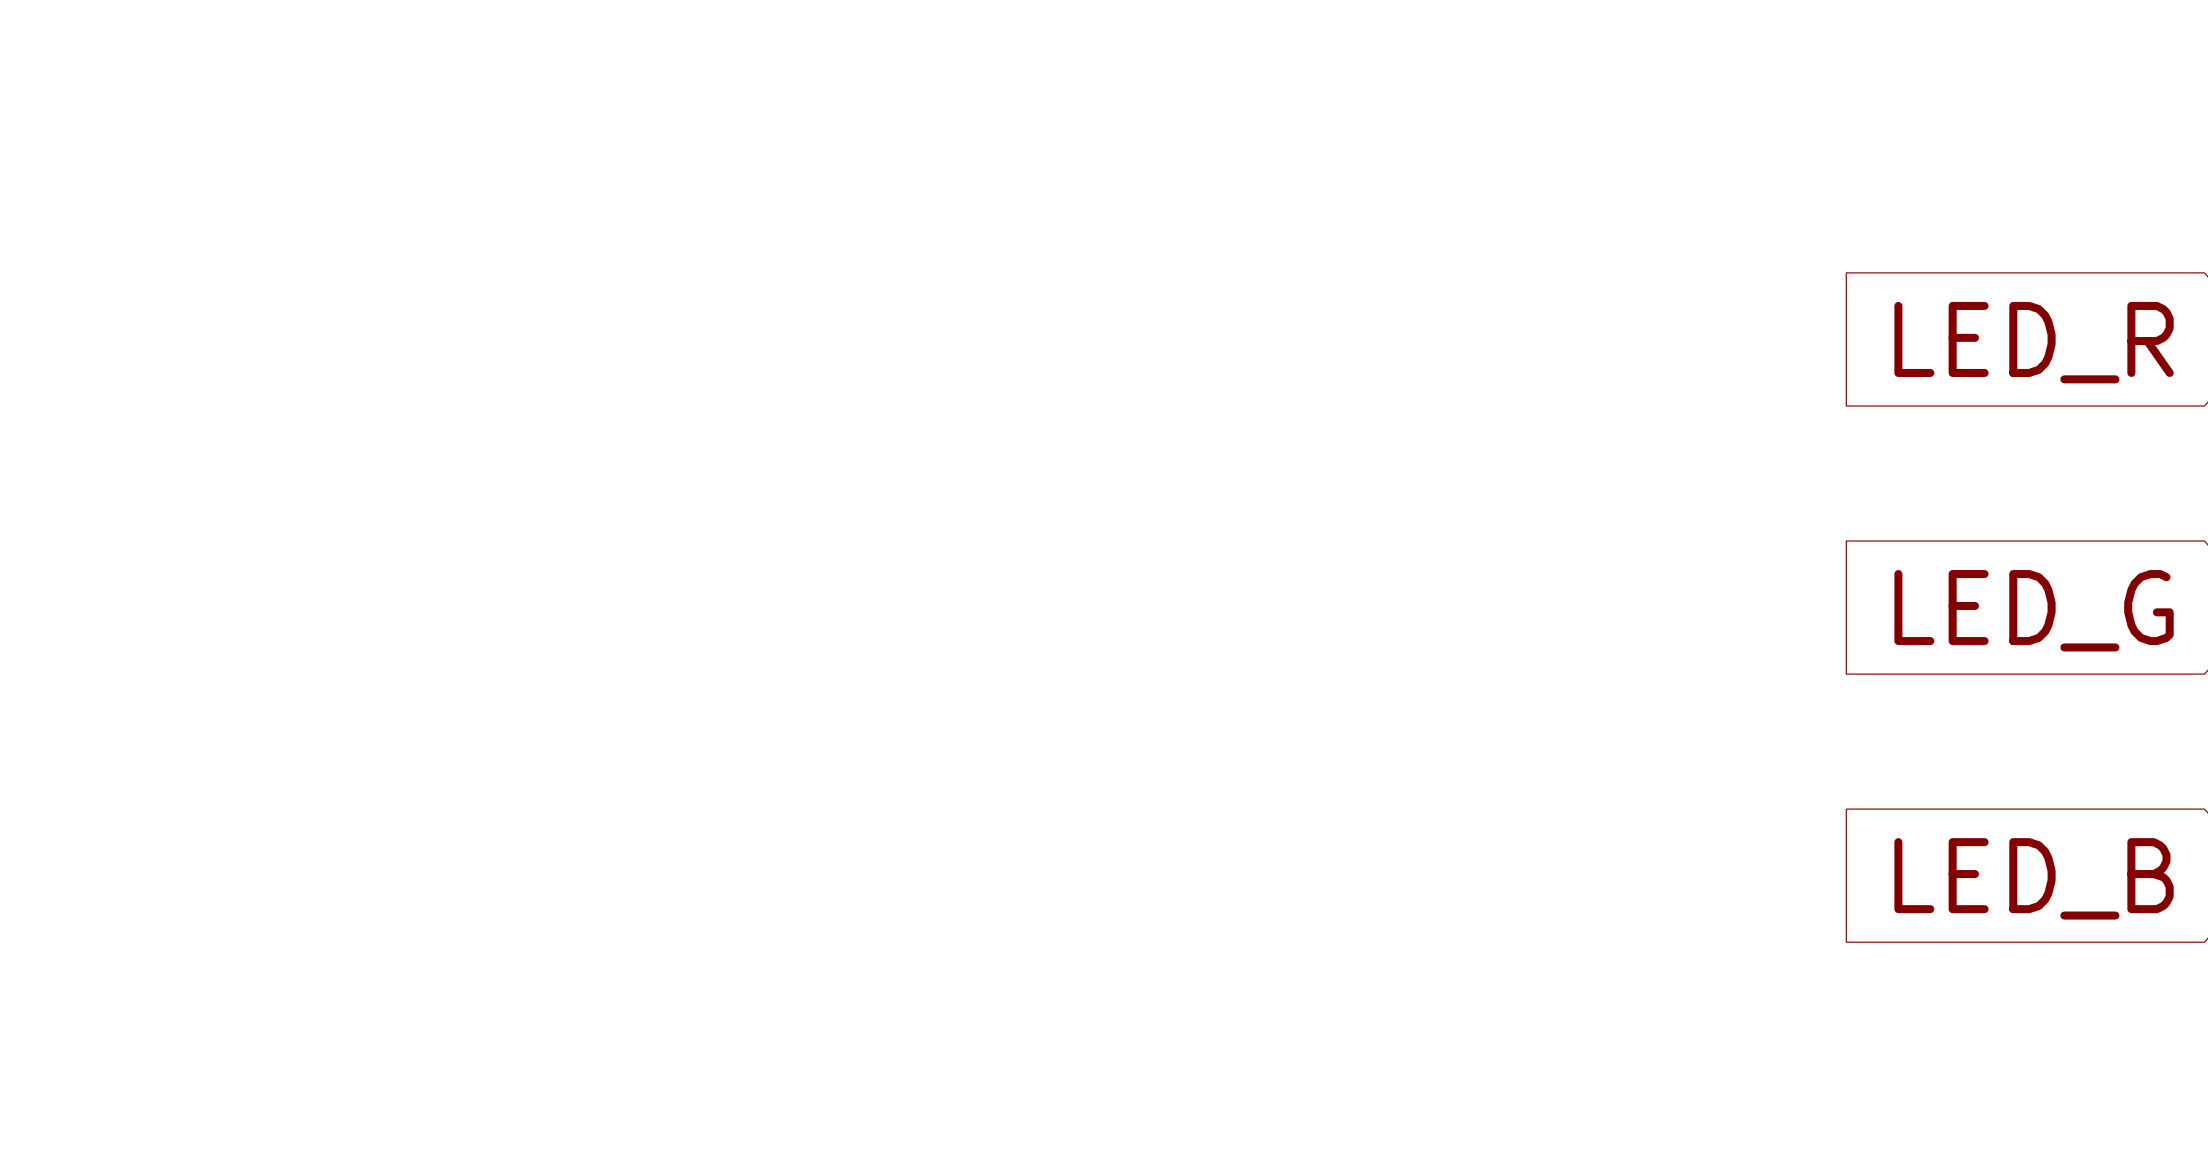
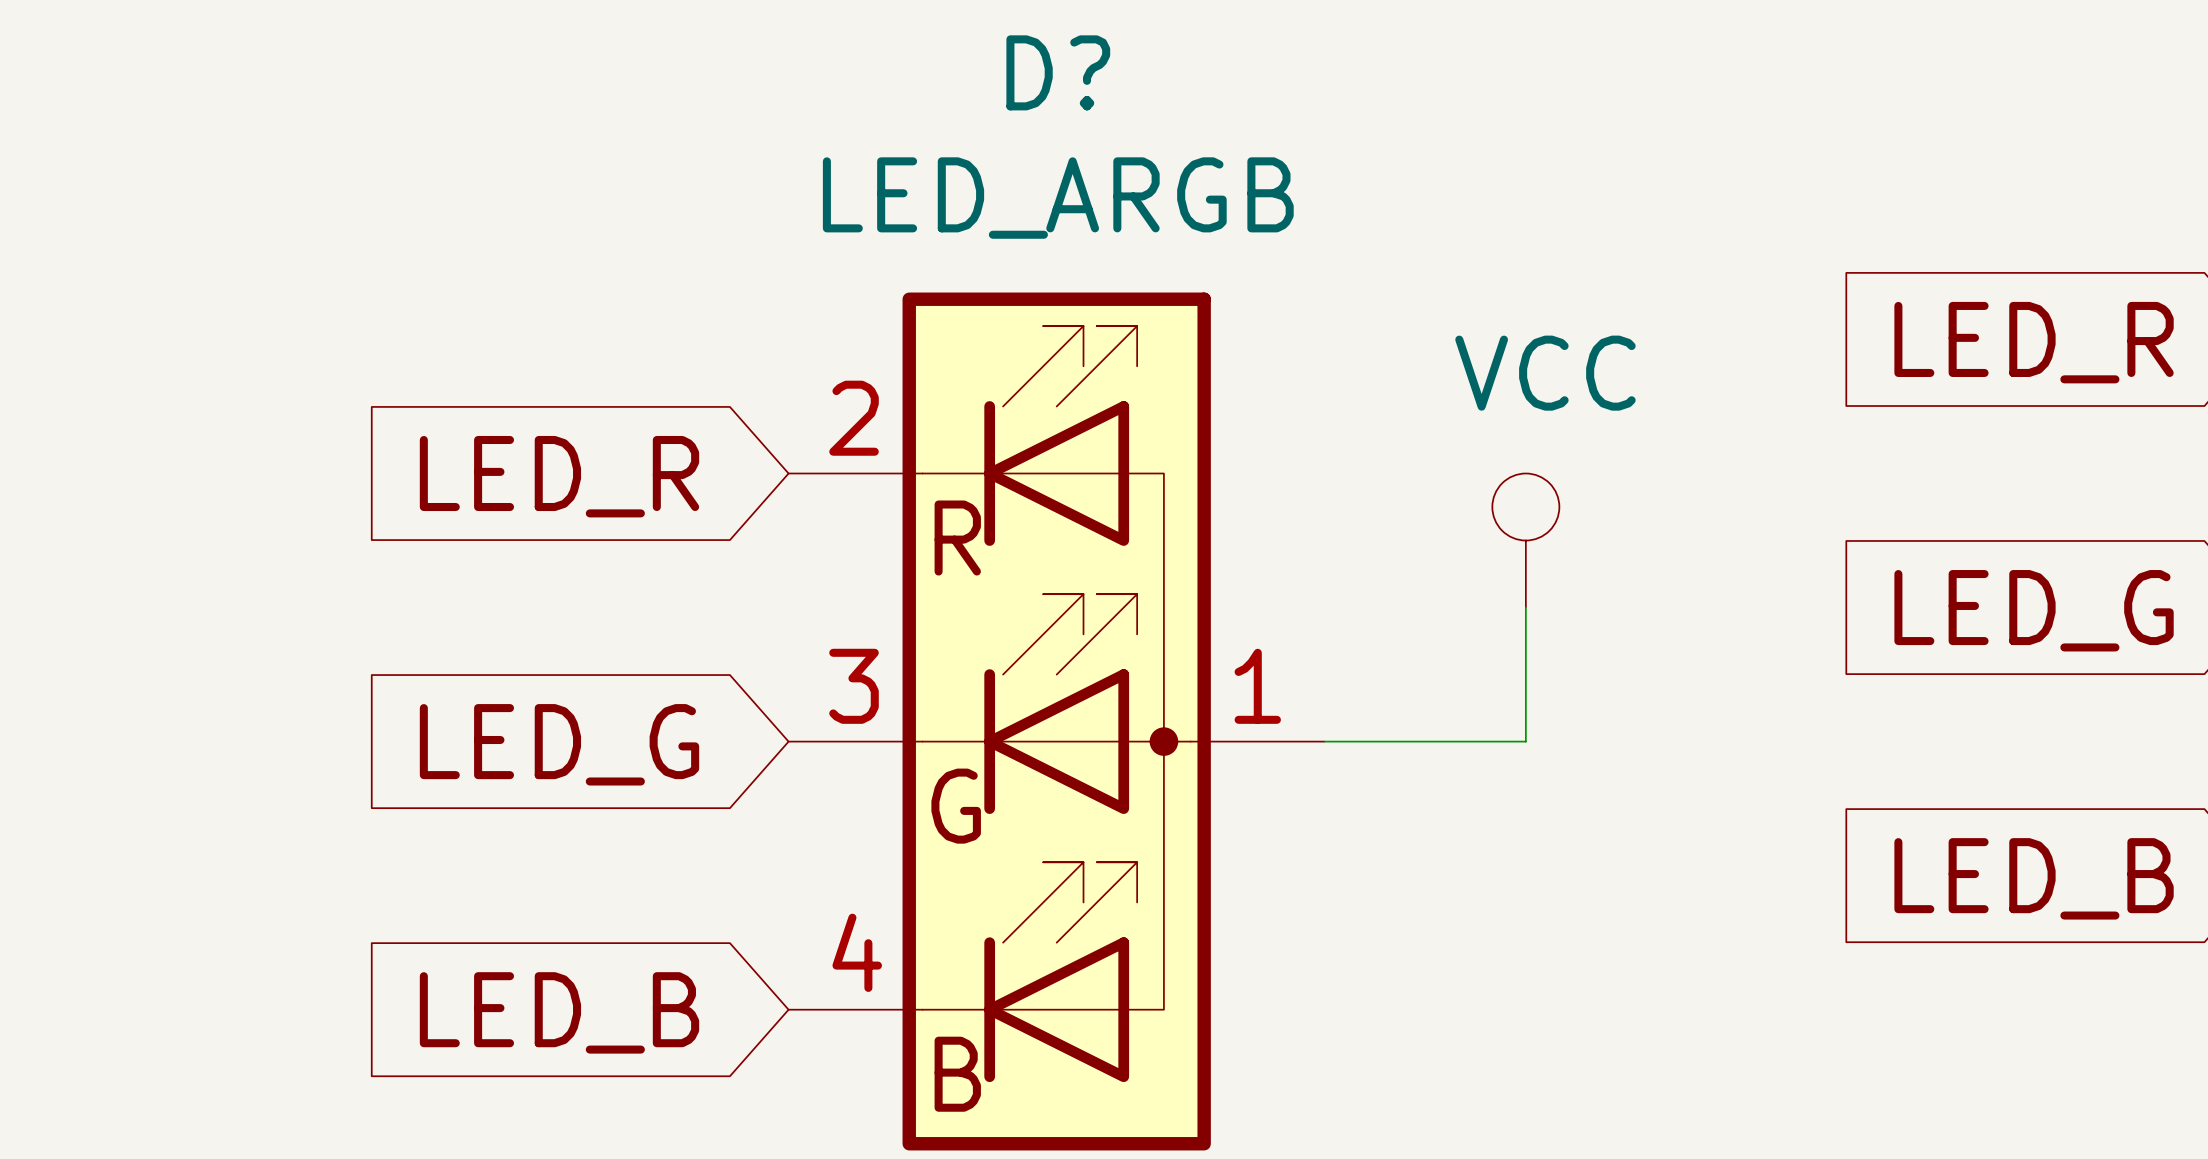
global label: none -> LED_R (559, 476)
power symbol: none -> VCC (1525, 540)
wire: none -> (1525, 607) (1525, 741) (1324, 741)
D?: none -> LED_ARGB (1056, 721)
global label: none -> LED_G (559, 744)
global label: none -> LED_B (559, 1012)

